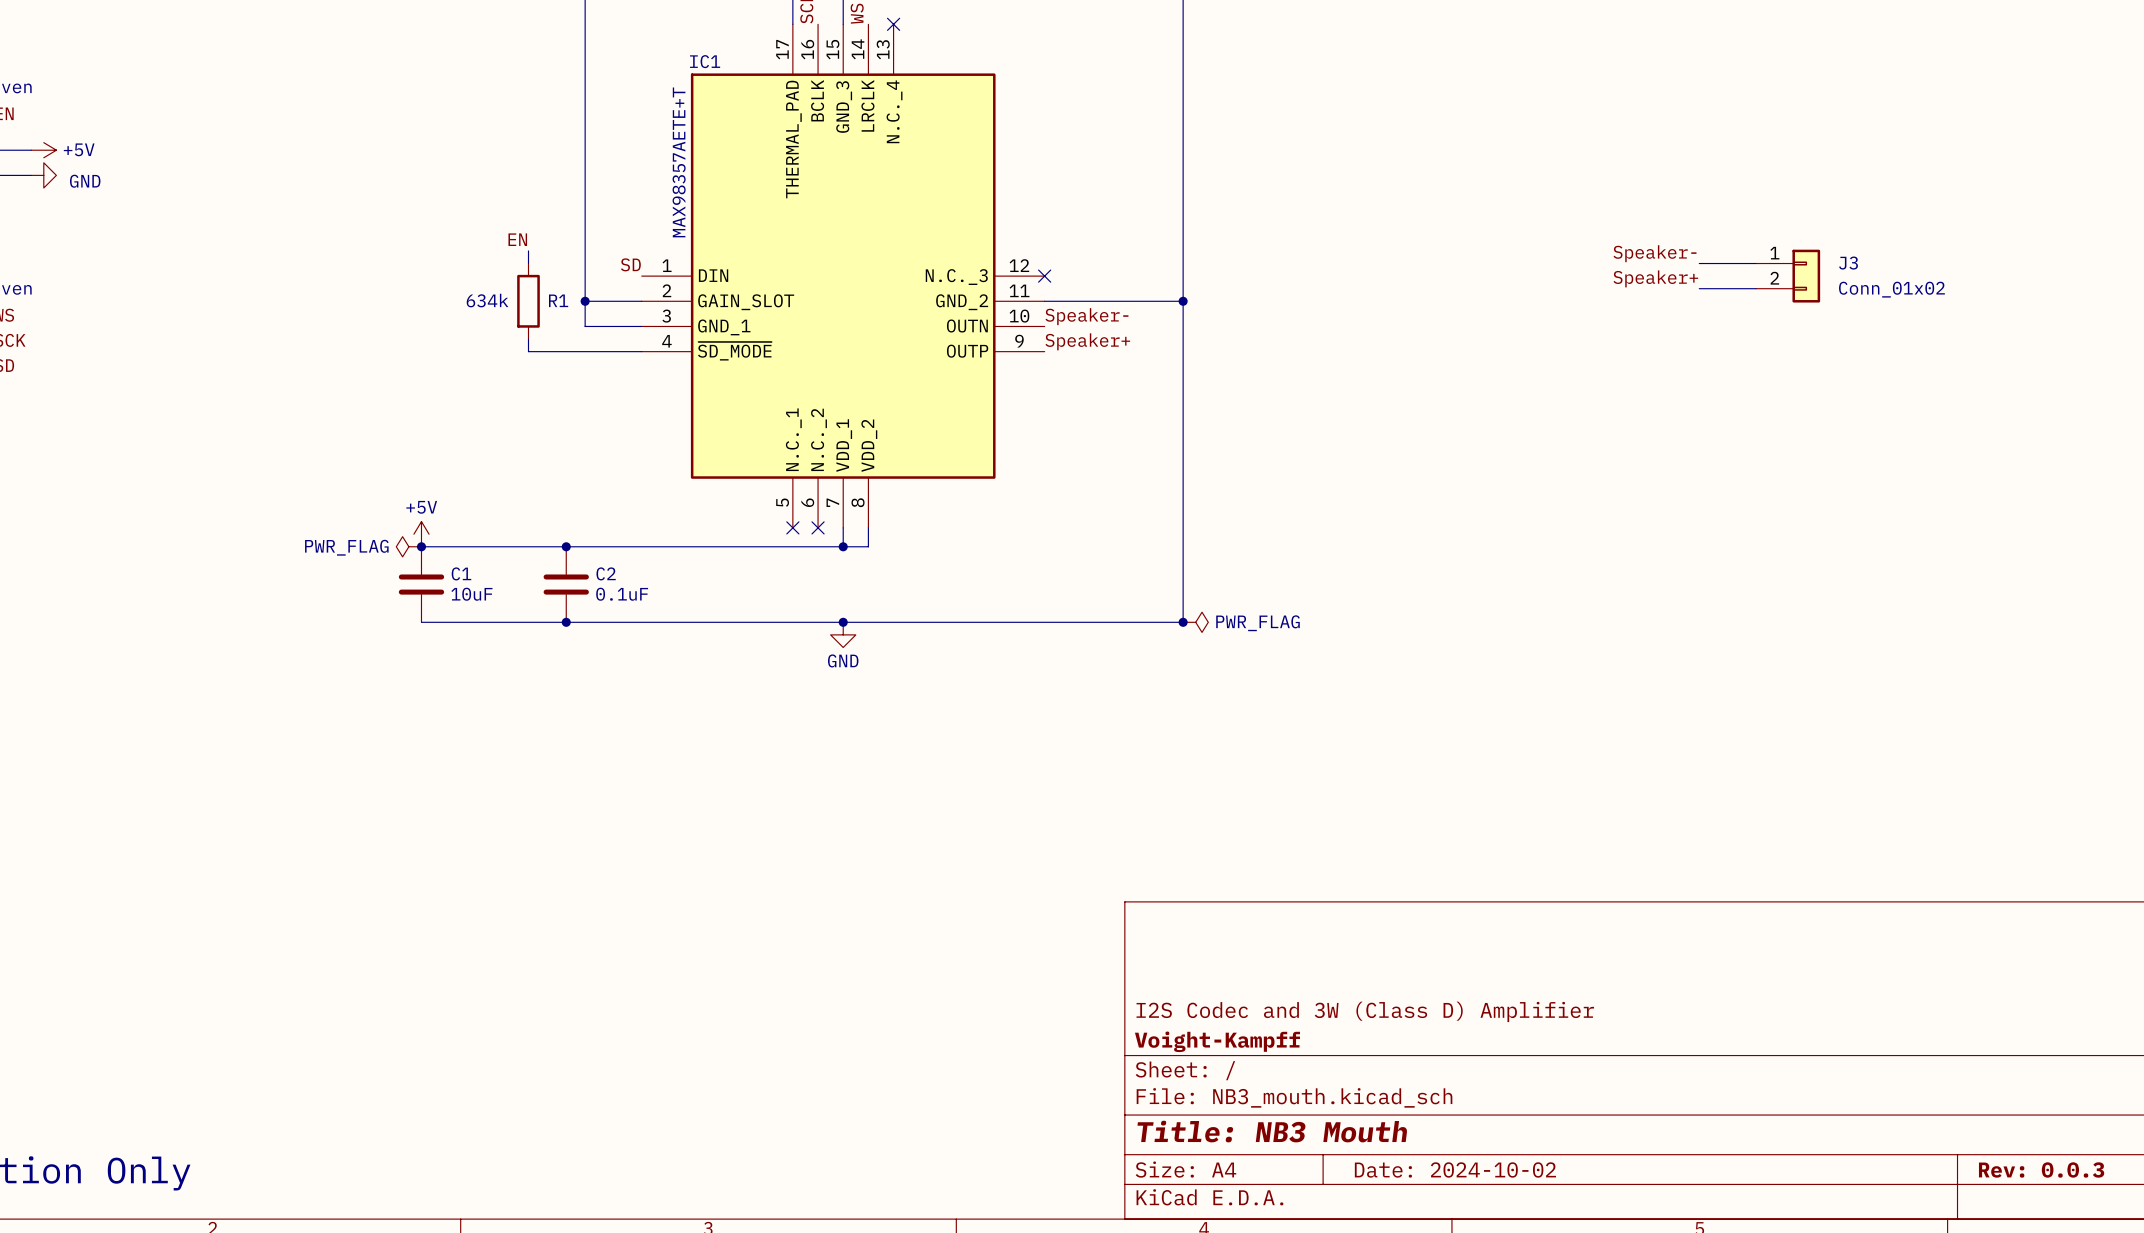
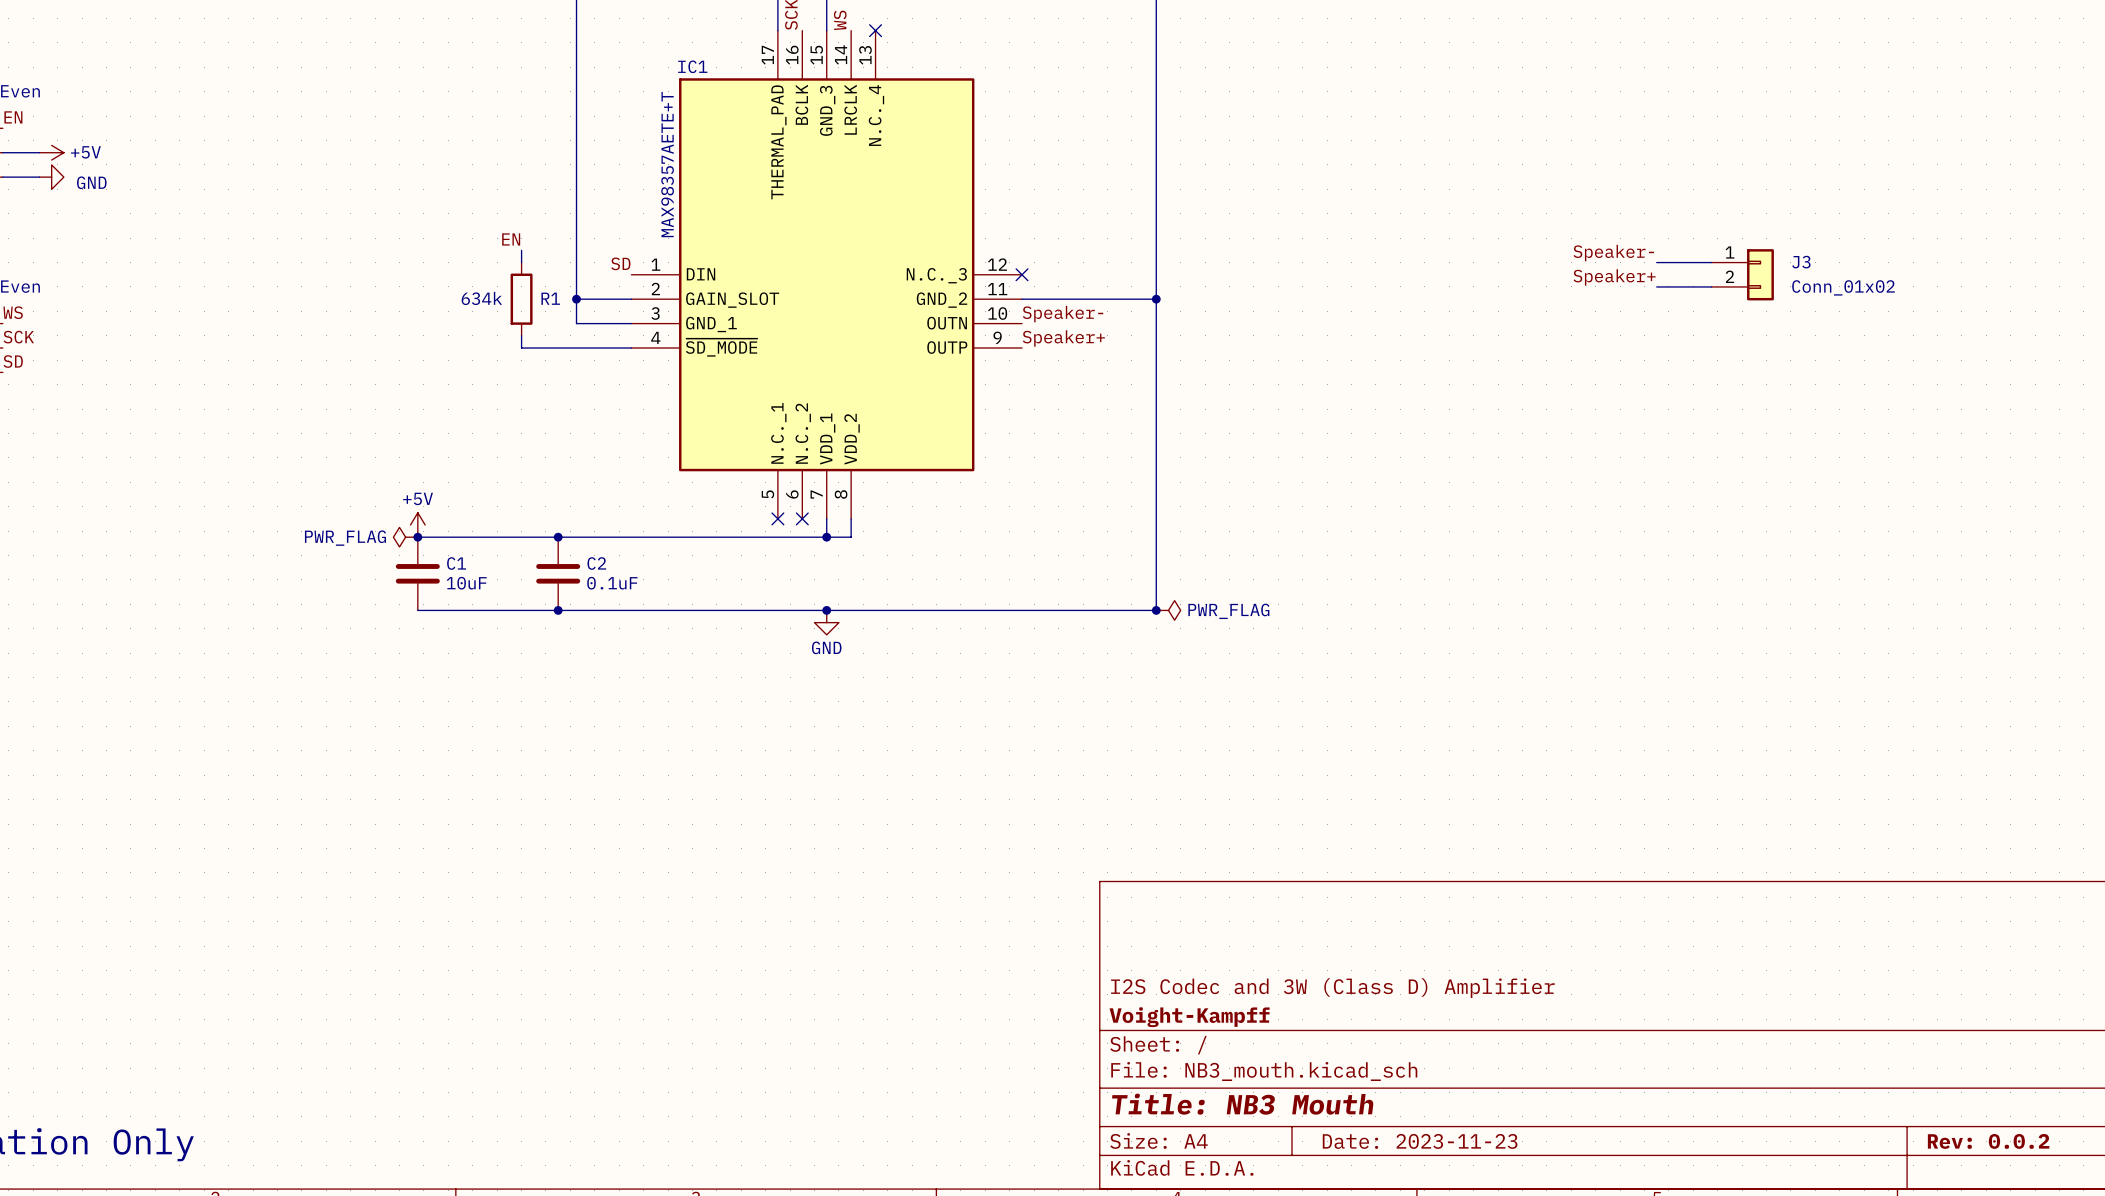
title block: Date: 2024-10-02 (1455, 1169) -> Date: 2023-11-23 (1420, 1141)
title block: Rev: 0.0.3 (2041, 1169) -> Rev: 0.0.2 (1988, 1141)

